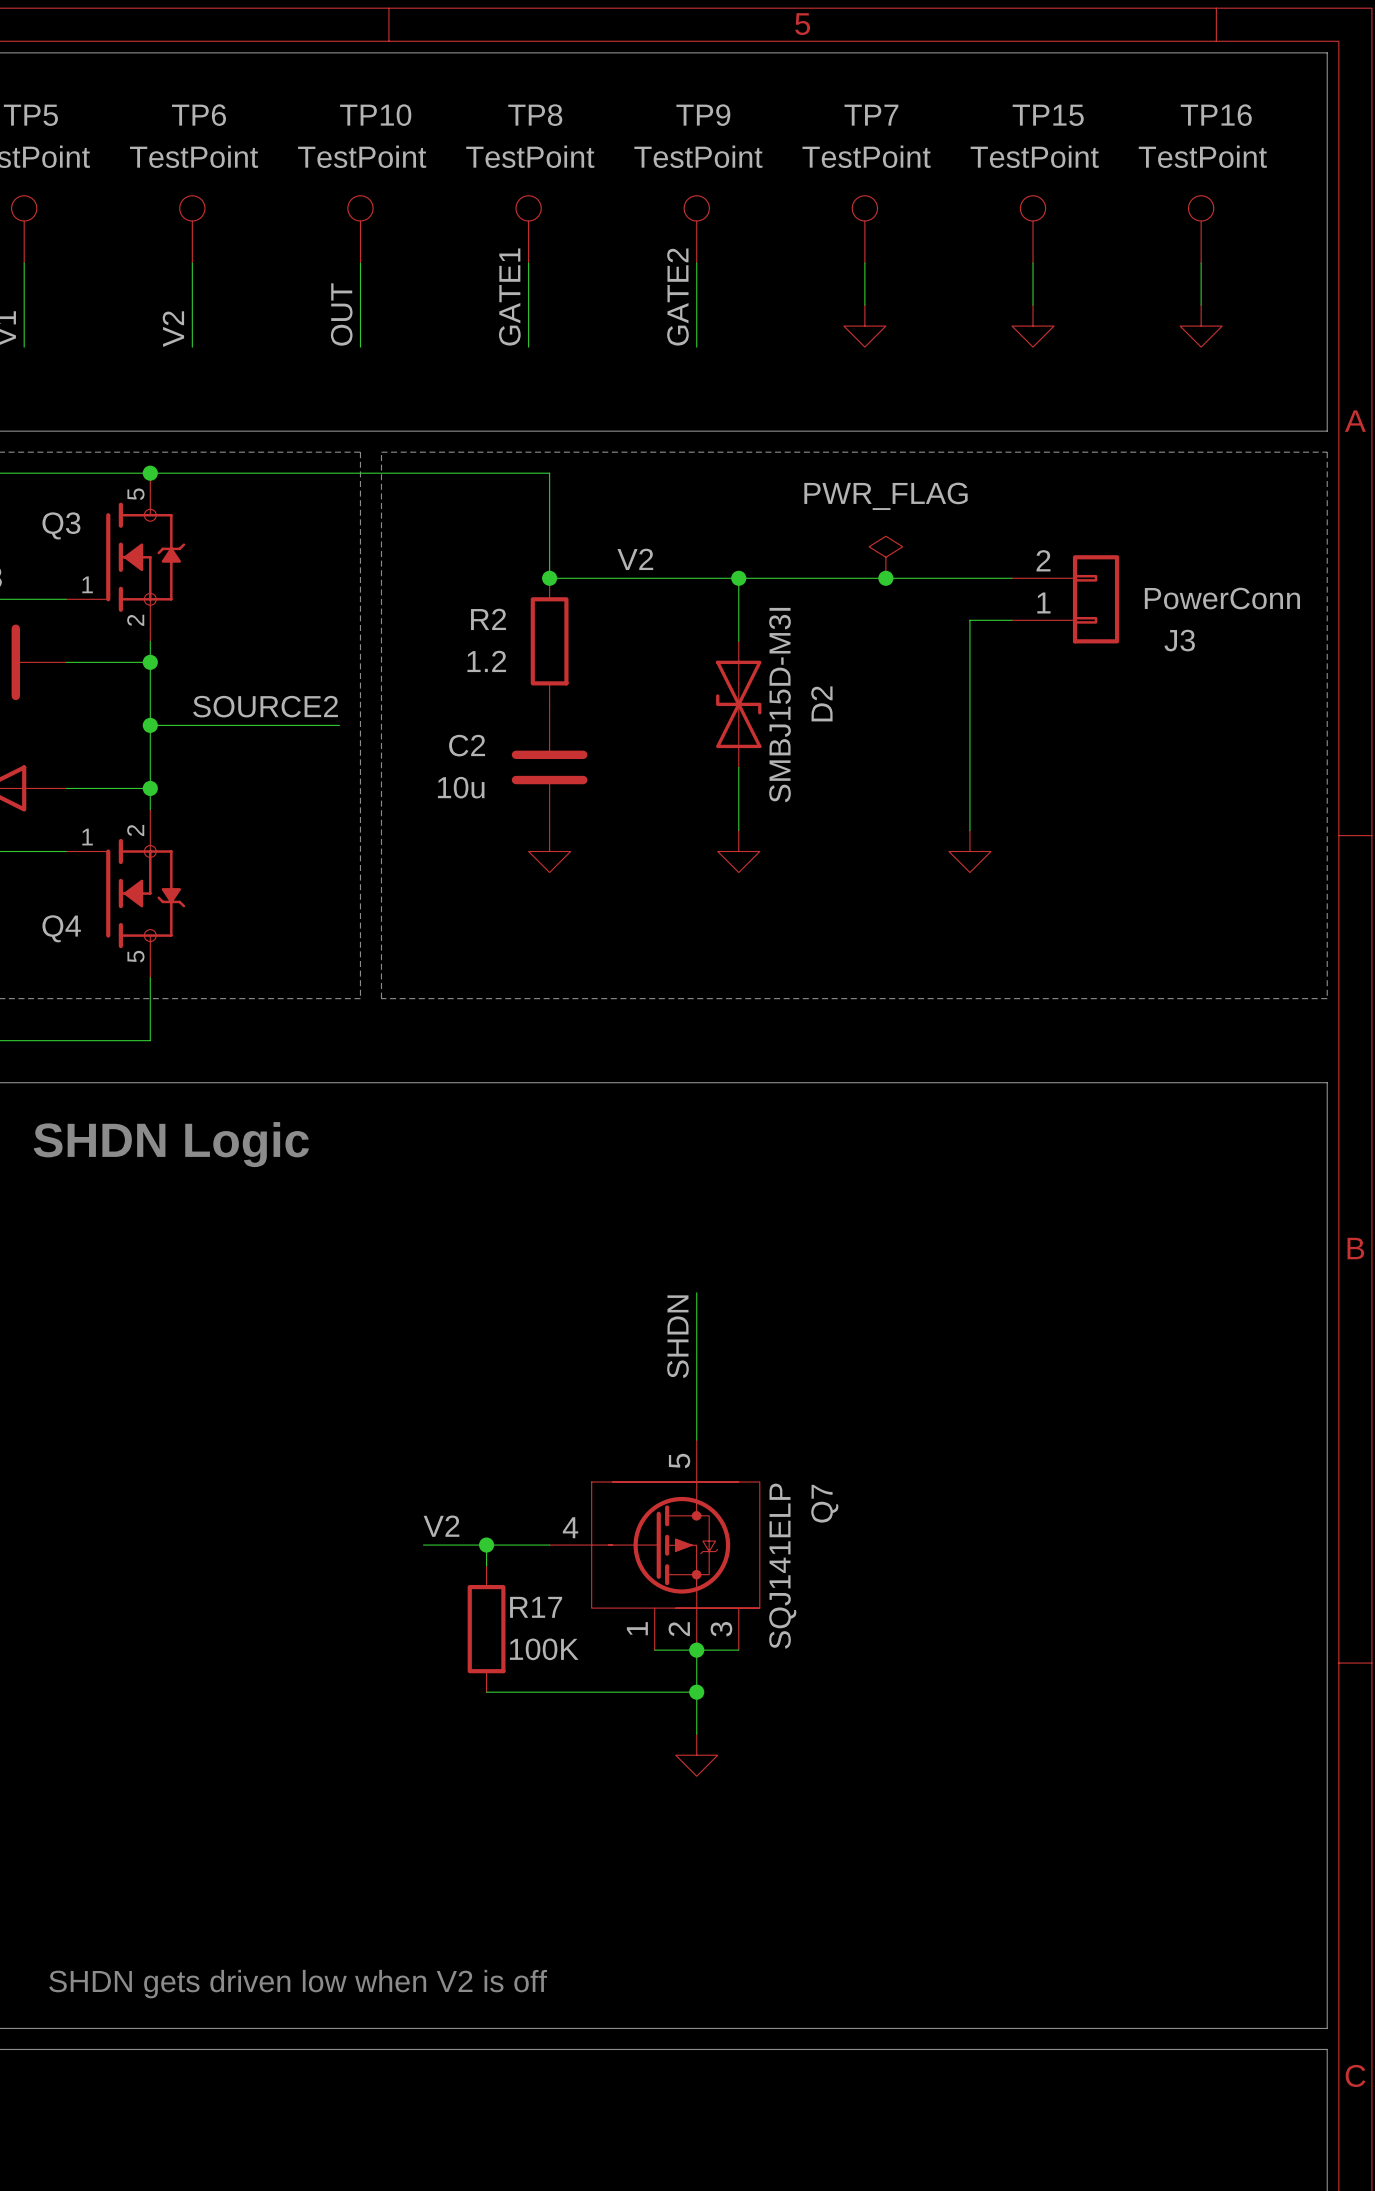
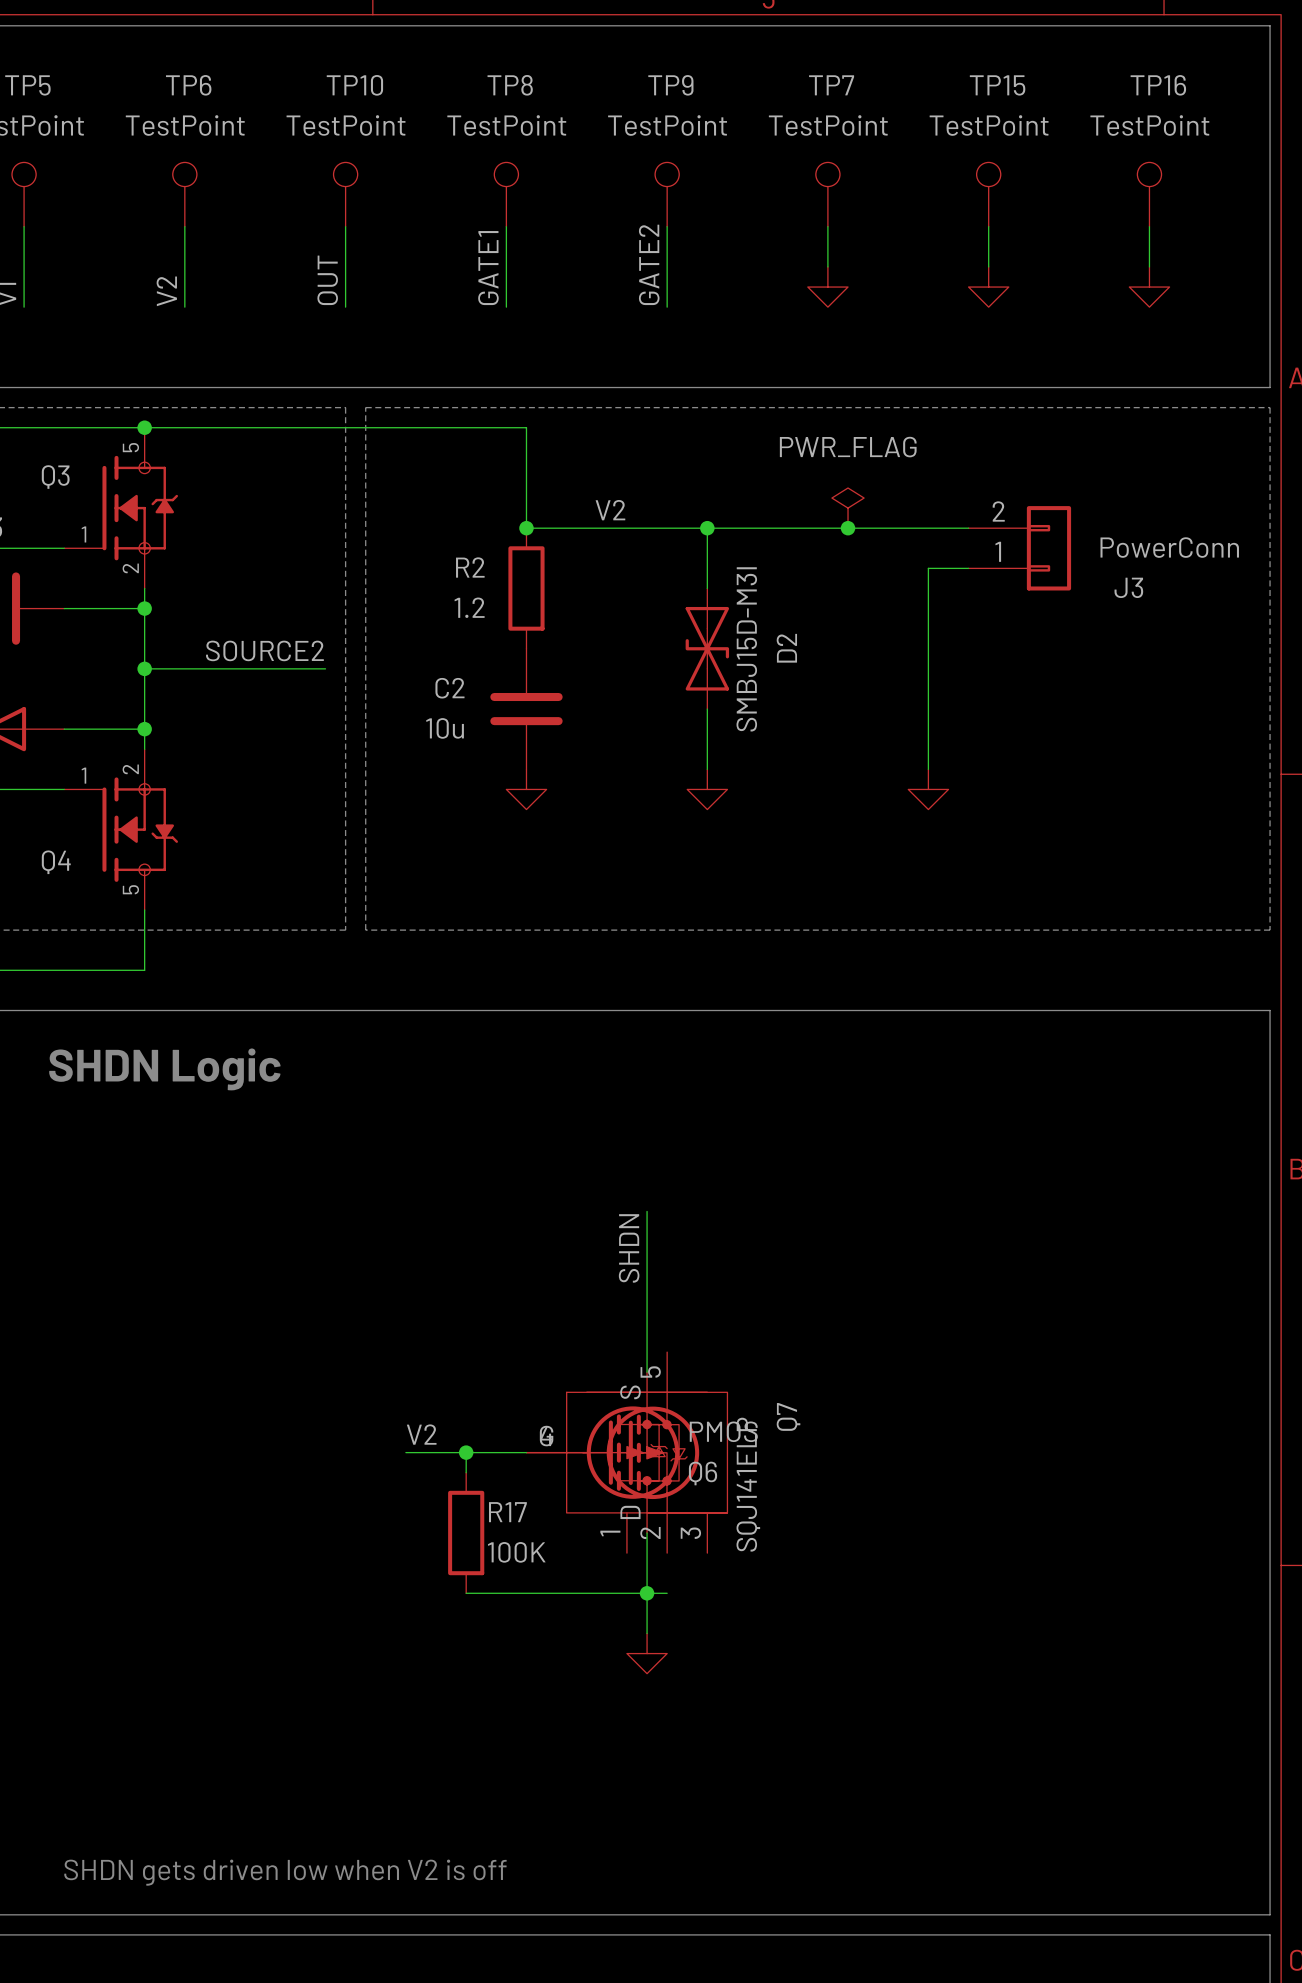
wire: none -> (647, 1211) (647, 1372)
wire: (696, 1292) (696, 1439) -> none
label position: SHDN (677, 1336) -> SHDN (629, 1248)
Q6: none -> PMOS (602, 1452)
wire: none -> (647, 1533) (647, 1633)
wire: (654, 1650) (738, 1650) -> none
wire: (696, 1650) (696, 1734) -> none
junction: (696, 1650) -> none
junction position: (696, 1692) -> (647, 1593)
power symbol position: (696, 1755) -> (647, 1653)

